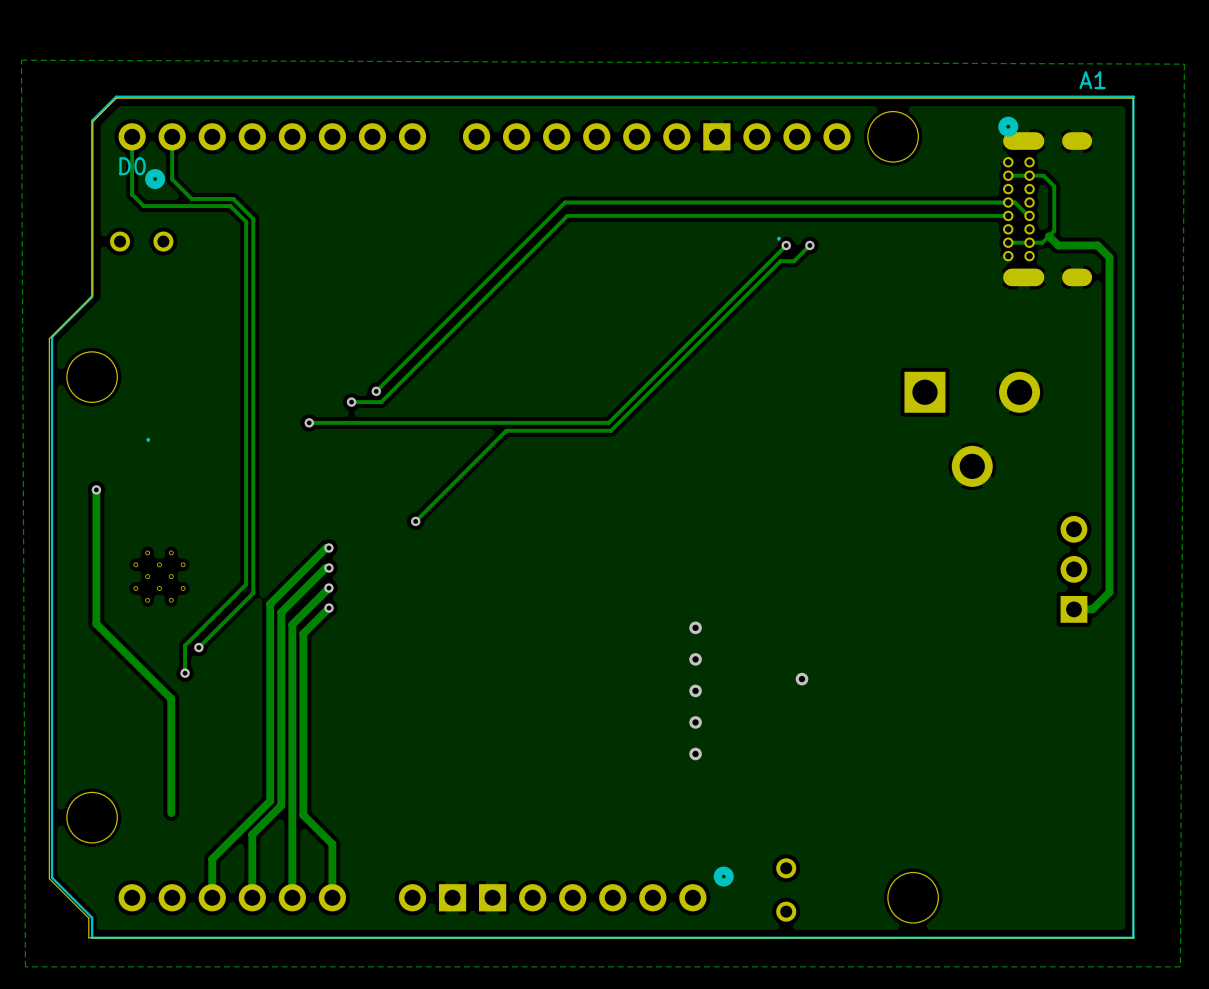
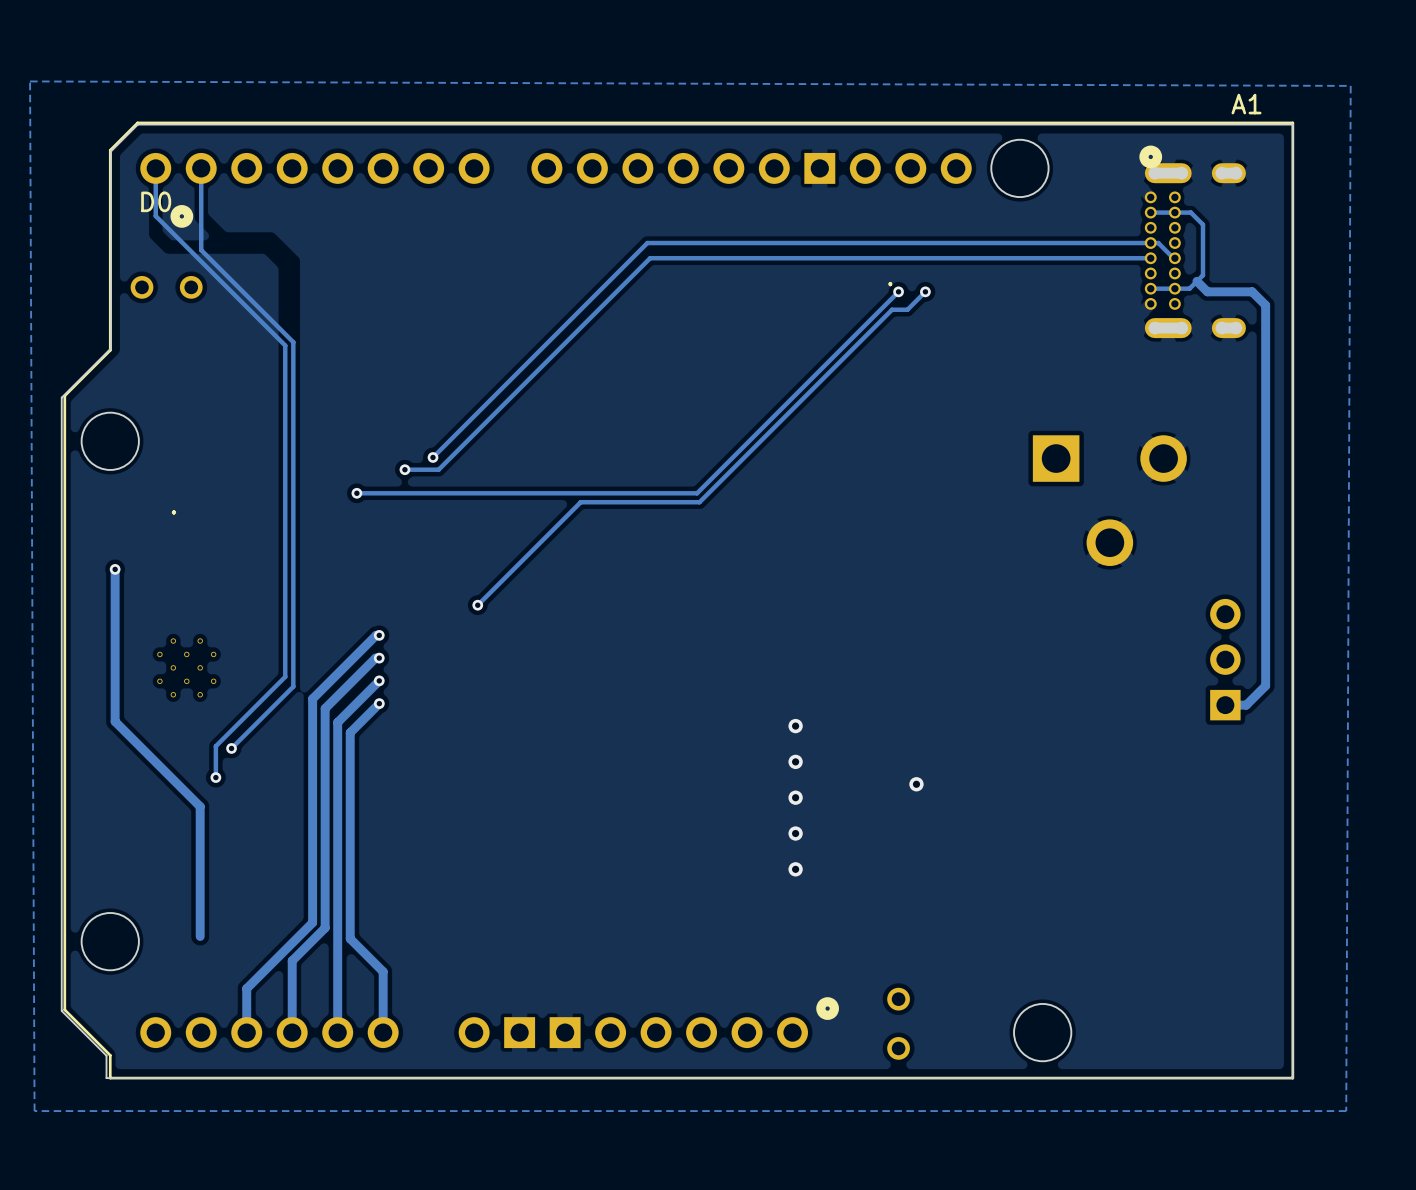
track: (132, 178) (132, 194) (143, 206) (230, 206) (246, 221) (246, 292) -> (155, 216) (285, 345)
track: (172, 179) (191, 198) (233, 198) (253, 218) (253, 289) -> (201, 216) (201, 250) (293, 342)

